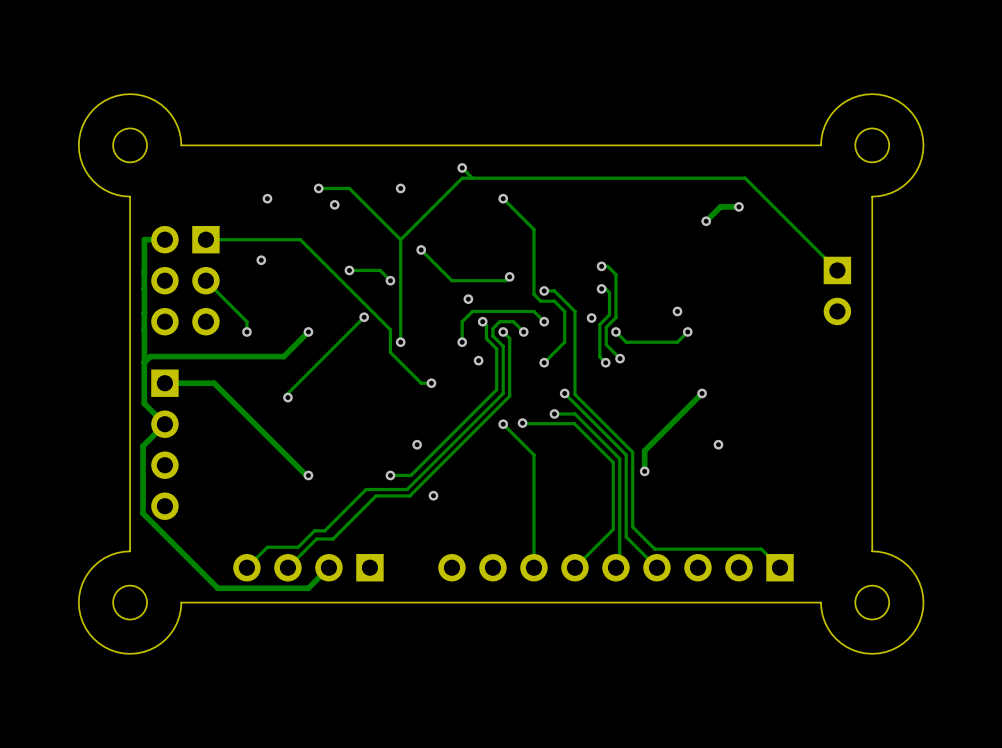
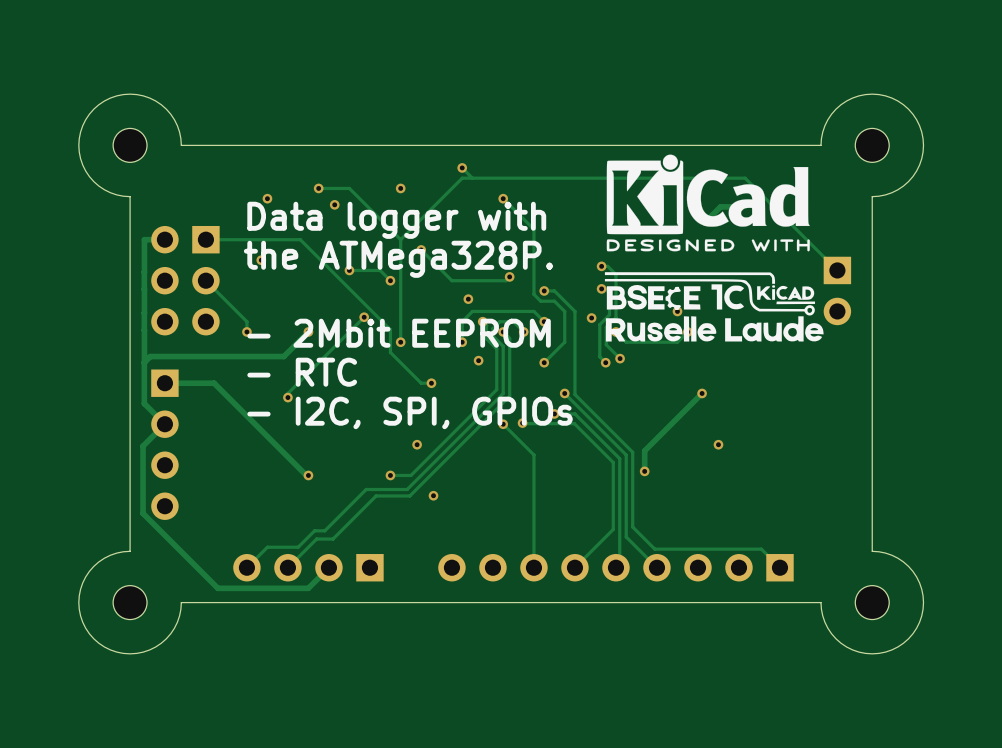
drawing: none -> [606, 154, 810, 252]
text: none -> Data logger with (396, 220)
text: none -> the ATMega328P. (398, 259)
drawing: none -> [604, 272, 824, 342]
text: none -> - 2Mbit EEPROM (399, 333)
text: none -> - RTC (302, 372)
text: none -> - I2C, SPI, GPIOs (410, 412)

